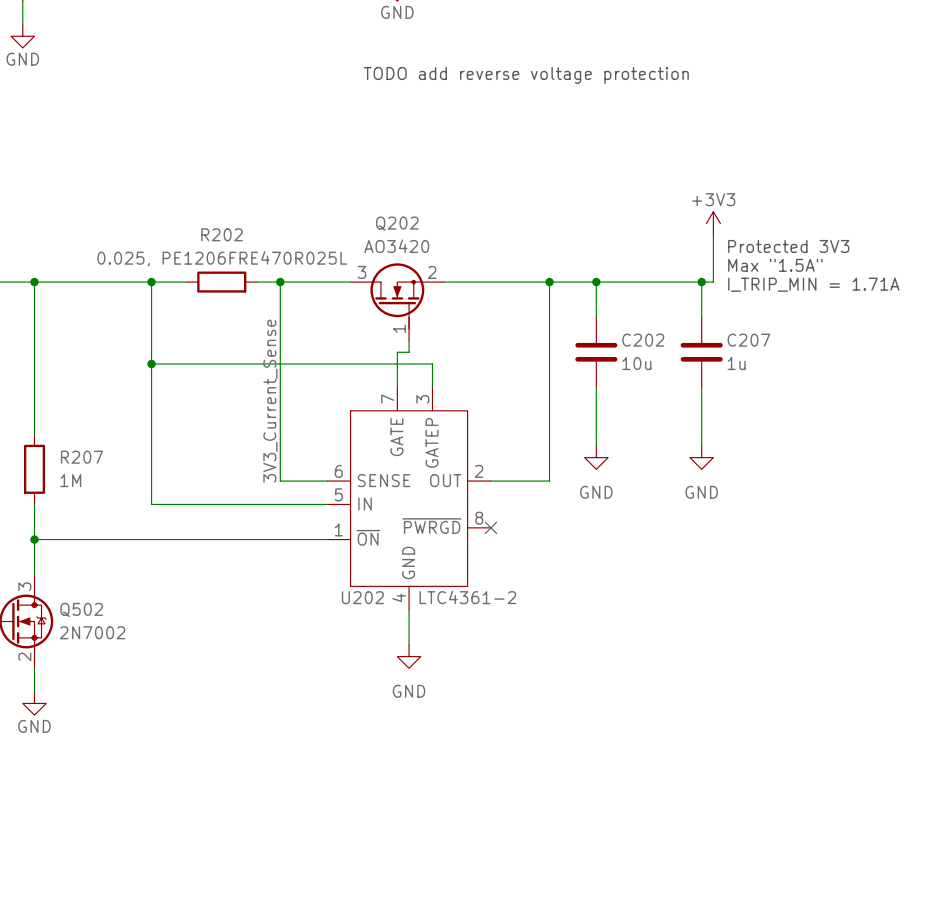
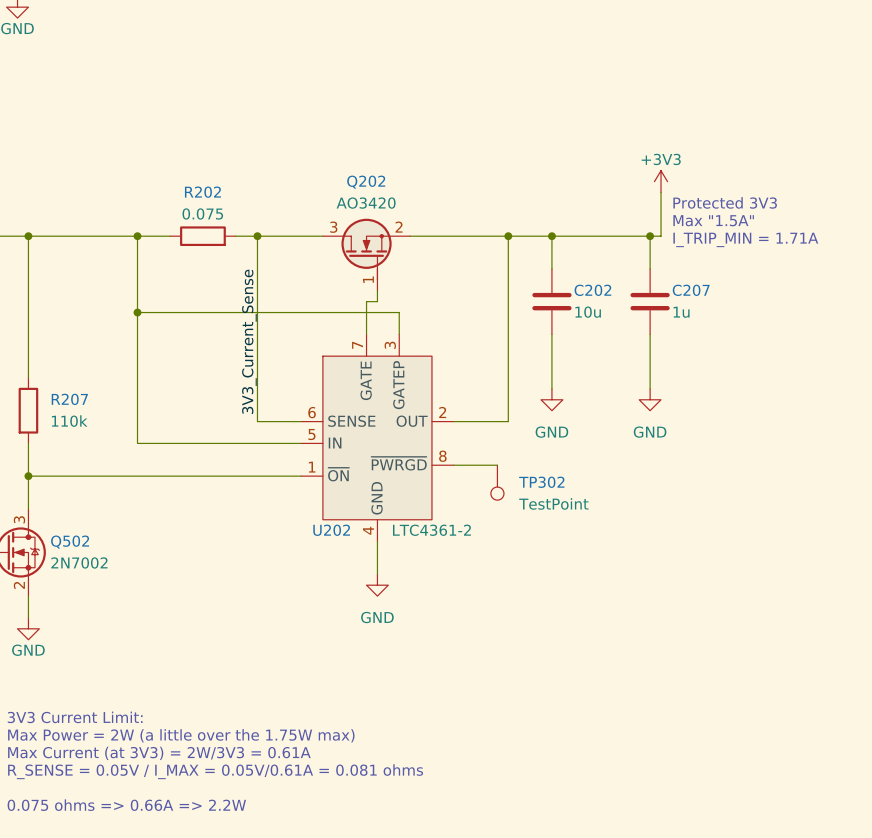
text: TODO add reverse voltage protection (526, 75) -> none
R202 value: 0.025, PE1206FRE470R025L (222, 258) -> 0.075 (202, 213)
R207 value: 1M (70, 480) -> 110k (69, 421)
wire: none -> (453, 465) (497, 465)
no-connect mark: (491, 527) -> none
TP302: none -> TestPoint (497, 482)
text: none -> 3V3 Current Limit: (75, 717)
text: none -> Max Power = 2W (a little over the 1.75W max) (181, 735)
text: none -> Max Current (at 3V3) = 2W/3V3 = 0.61A (159, 753)
text: none -> R_SENSE = 0.05V / I_MAX = 0.05V/0.61A = 0.081 ohms (215, 771)
text: none -> 0.075 ohms => 0.66A => 2.2W (126, 805)

